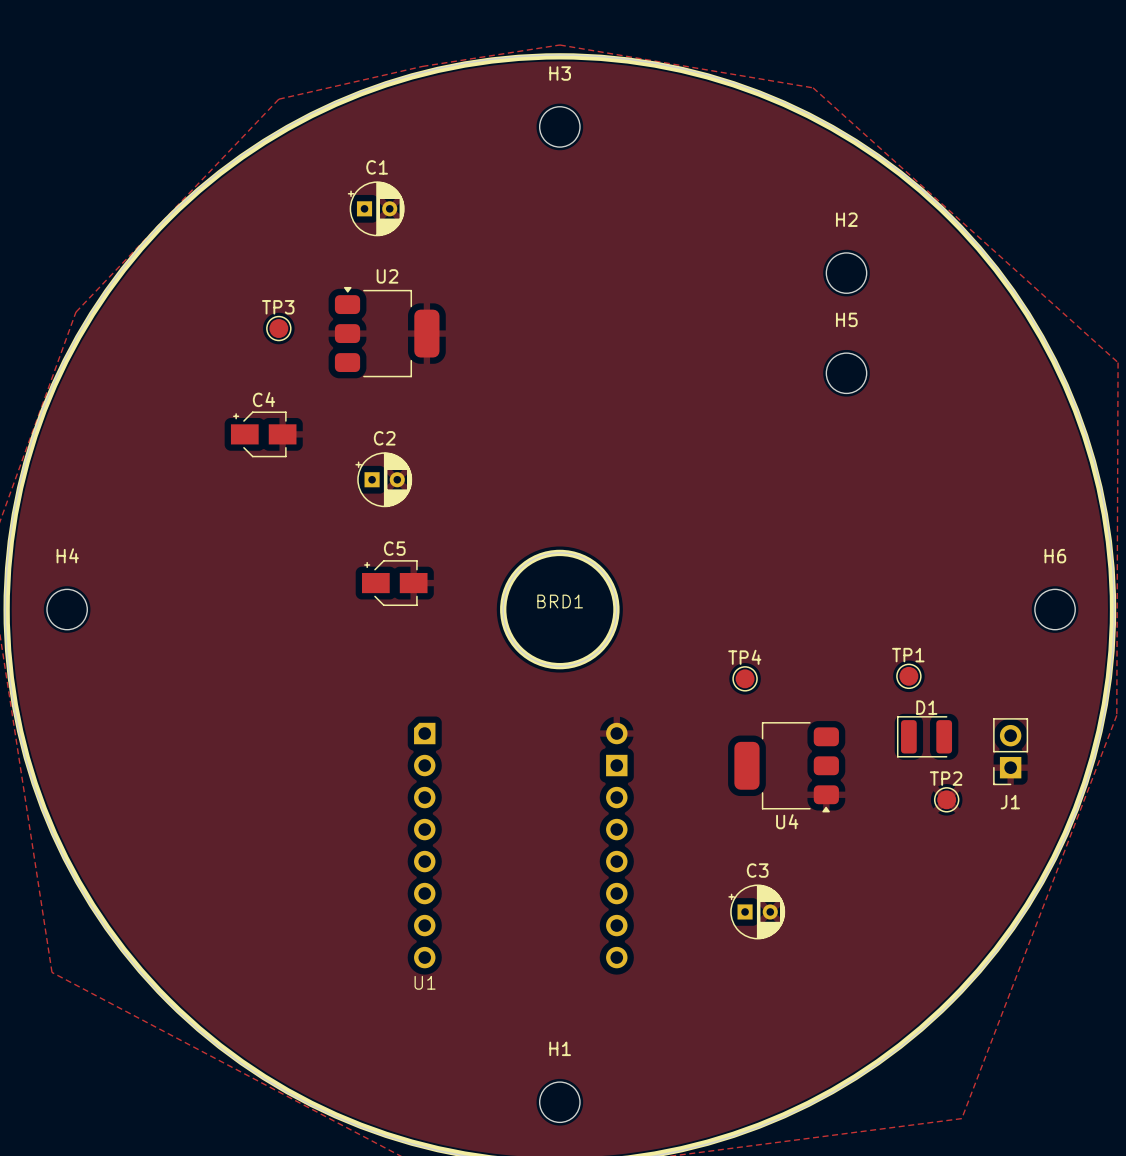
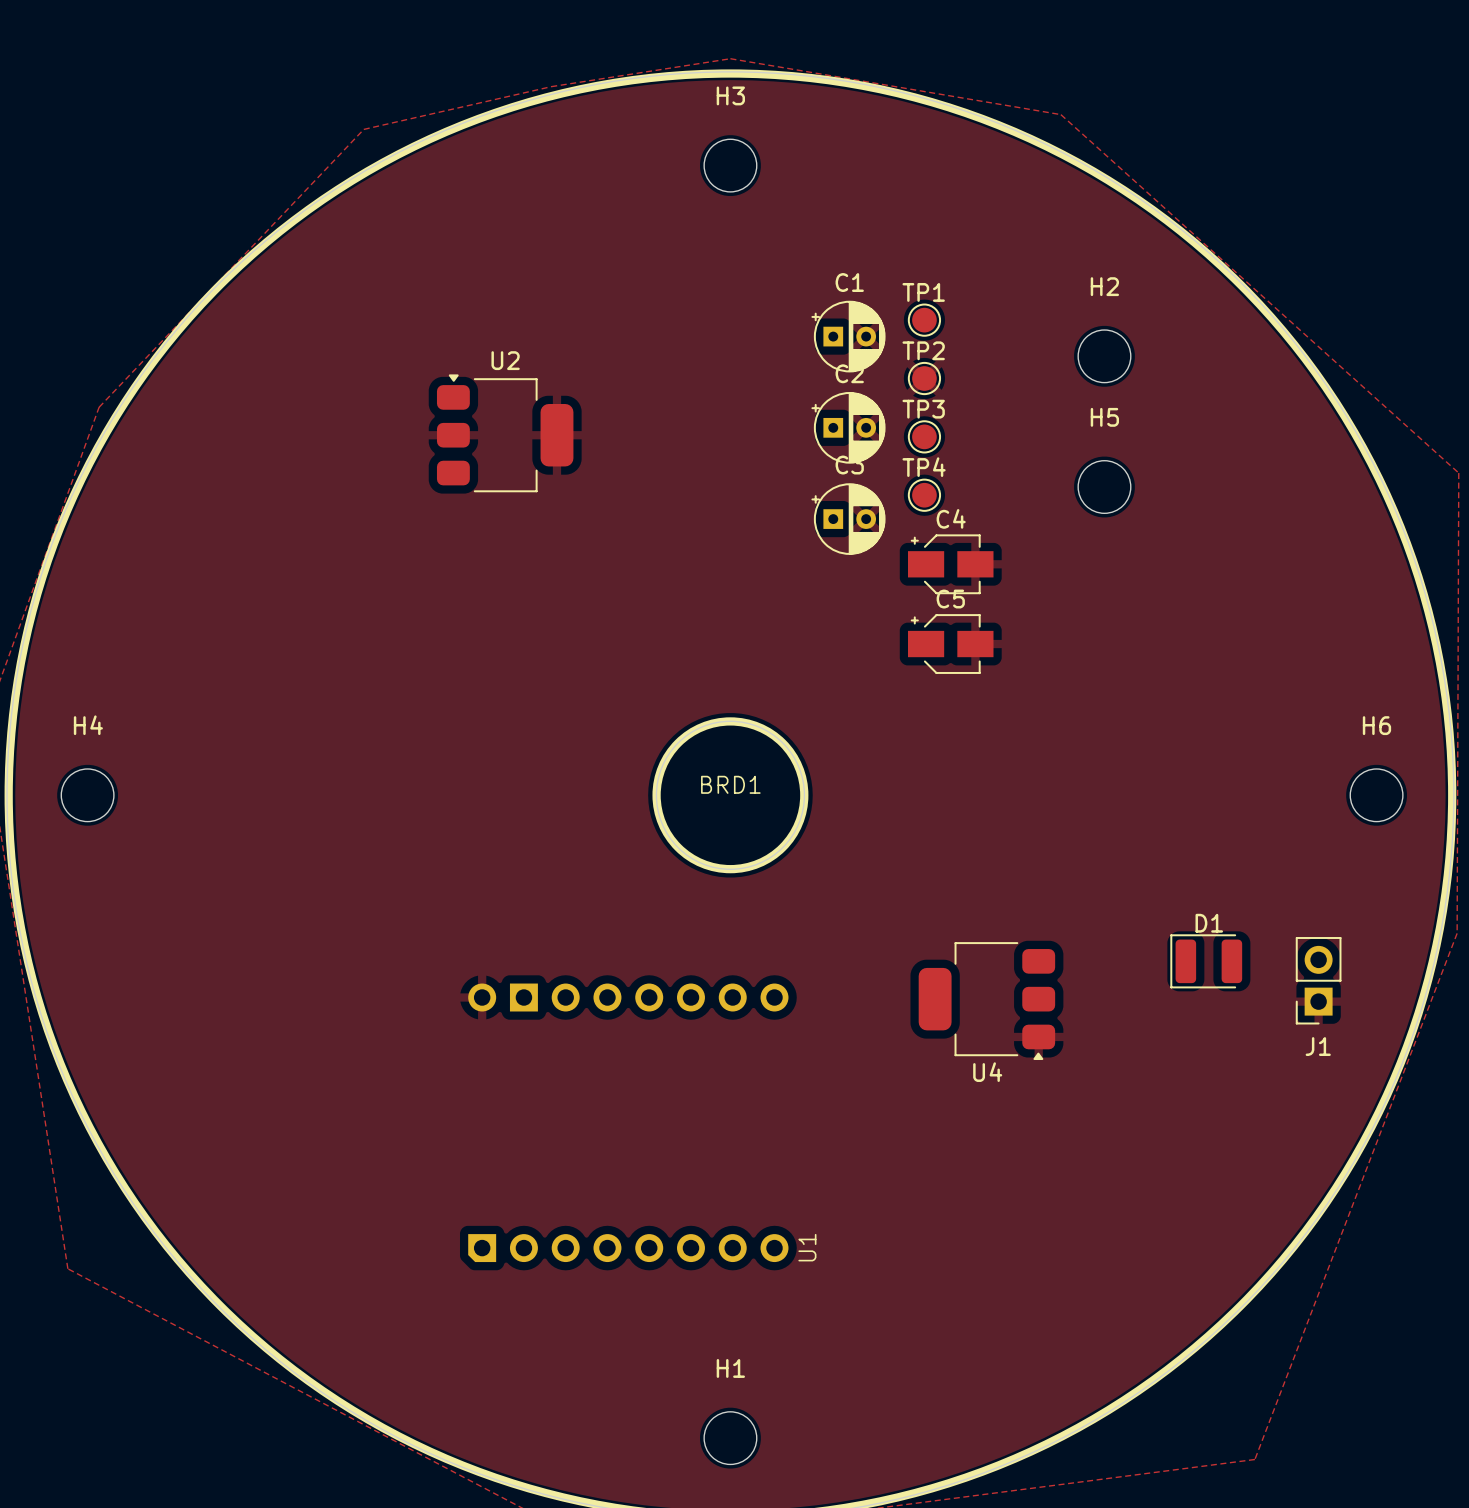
C1 position: (376, 208) -> (848, 336)
TP3 position: (278, 328) -> (924, 436)
C4 position: (263, 434) -> (950, 564)
C2 position: (383, 479) -> (848, 427)
C5 position: (394, 583) -> (950, 644)
TP1 position: (908, 676) -> (924, 320)
TP4 position: (745, 678) -> (924, 495)
U4 position: (786, 767) -> (986, 1001)
TP2 position: (946, 799) -> (924, 378)
U1 rotation: 0° (520, 845) -> 90° counterclockwise (628, 1122)
C3 position: (756, 911) -> (848, 519)

